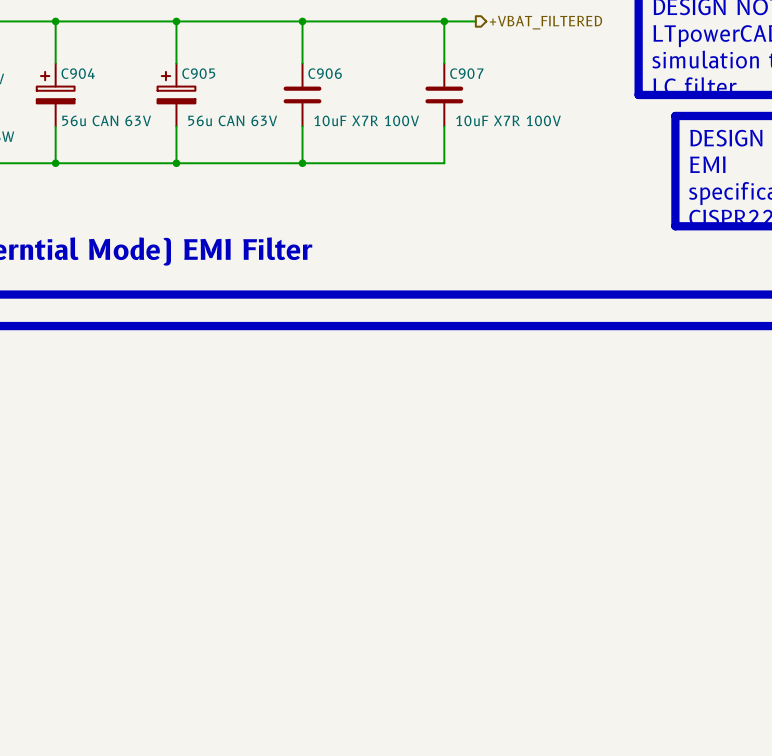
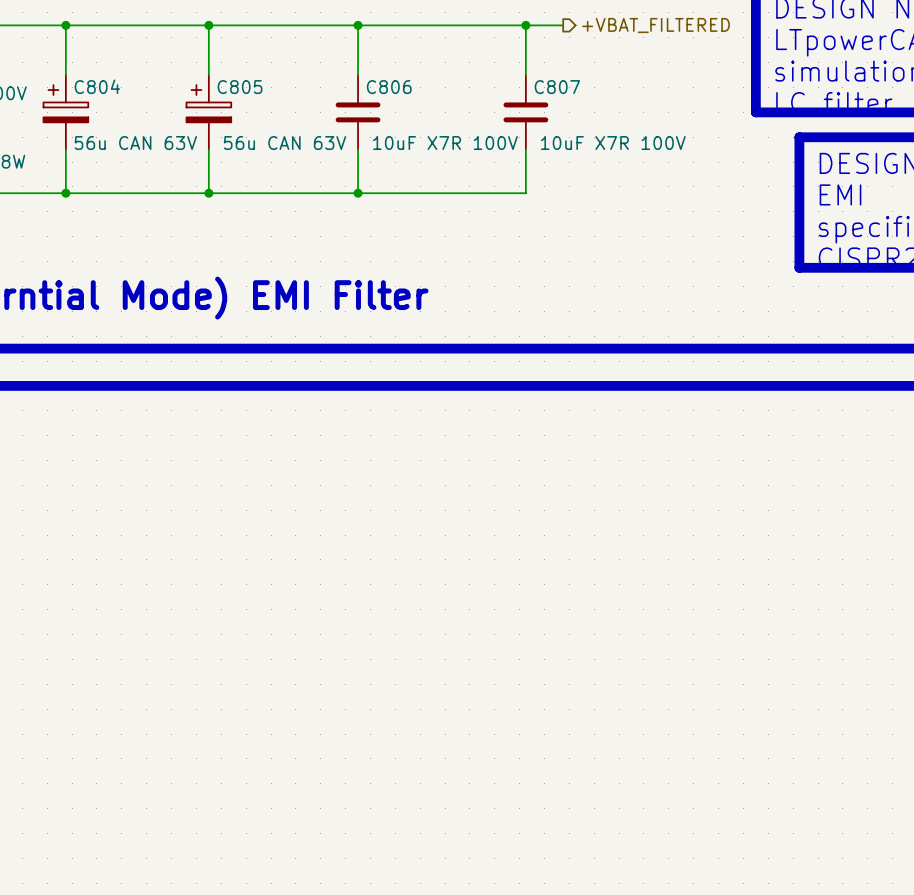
C904 name: C904 (78, 73) -> C804 (97, 86)
C905 name: C905 (198, 73) -> C805 (240, 87)
C906 name: C906 (325, 73) -> C806 (389, 87)
C907 name: C907 (466, 73) -> C807 (557, 87)

